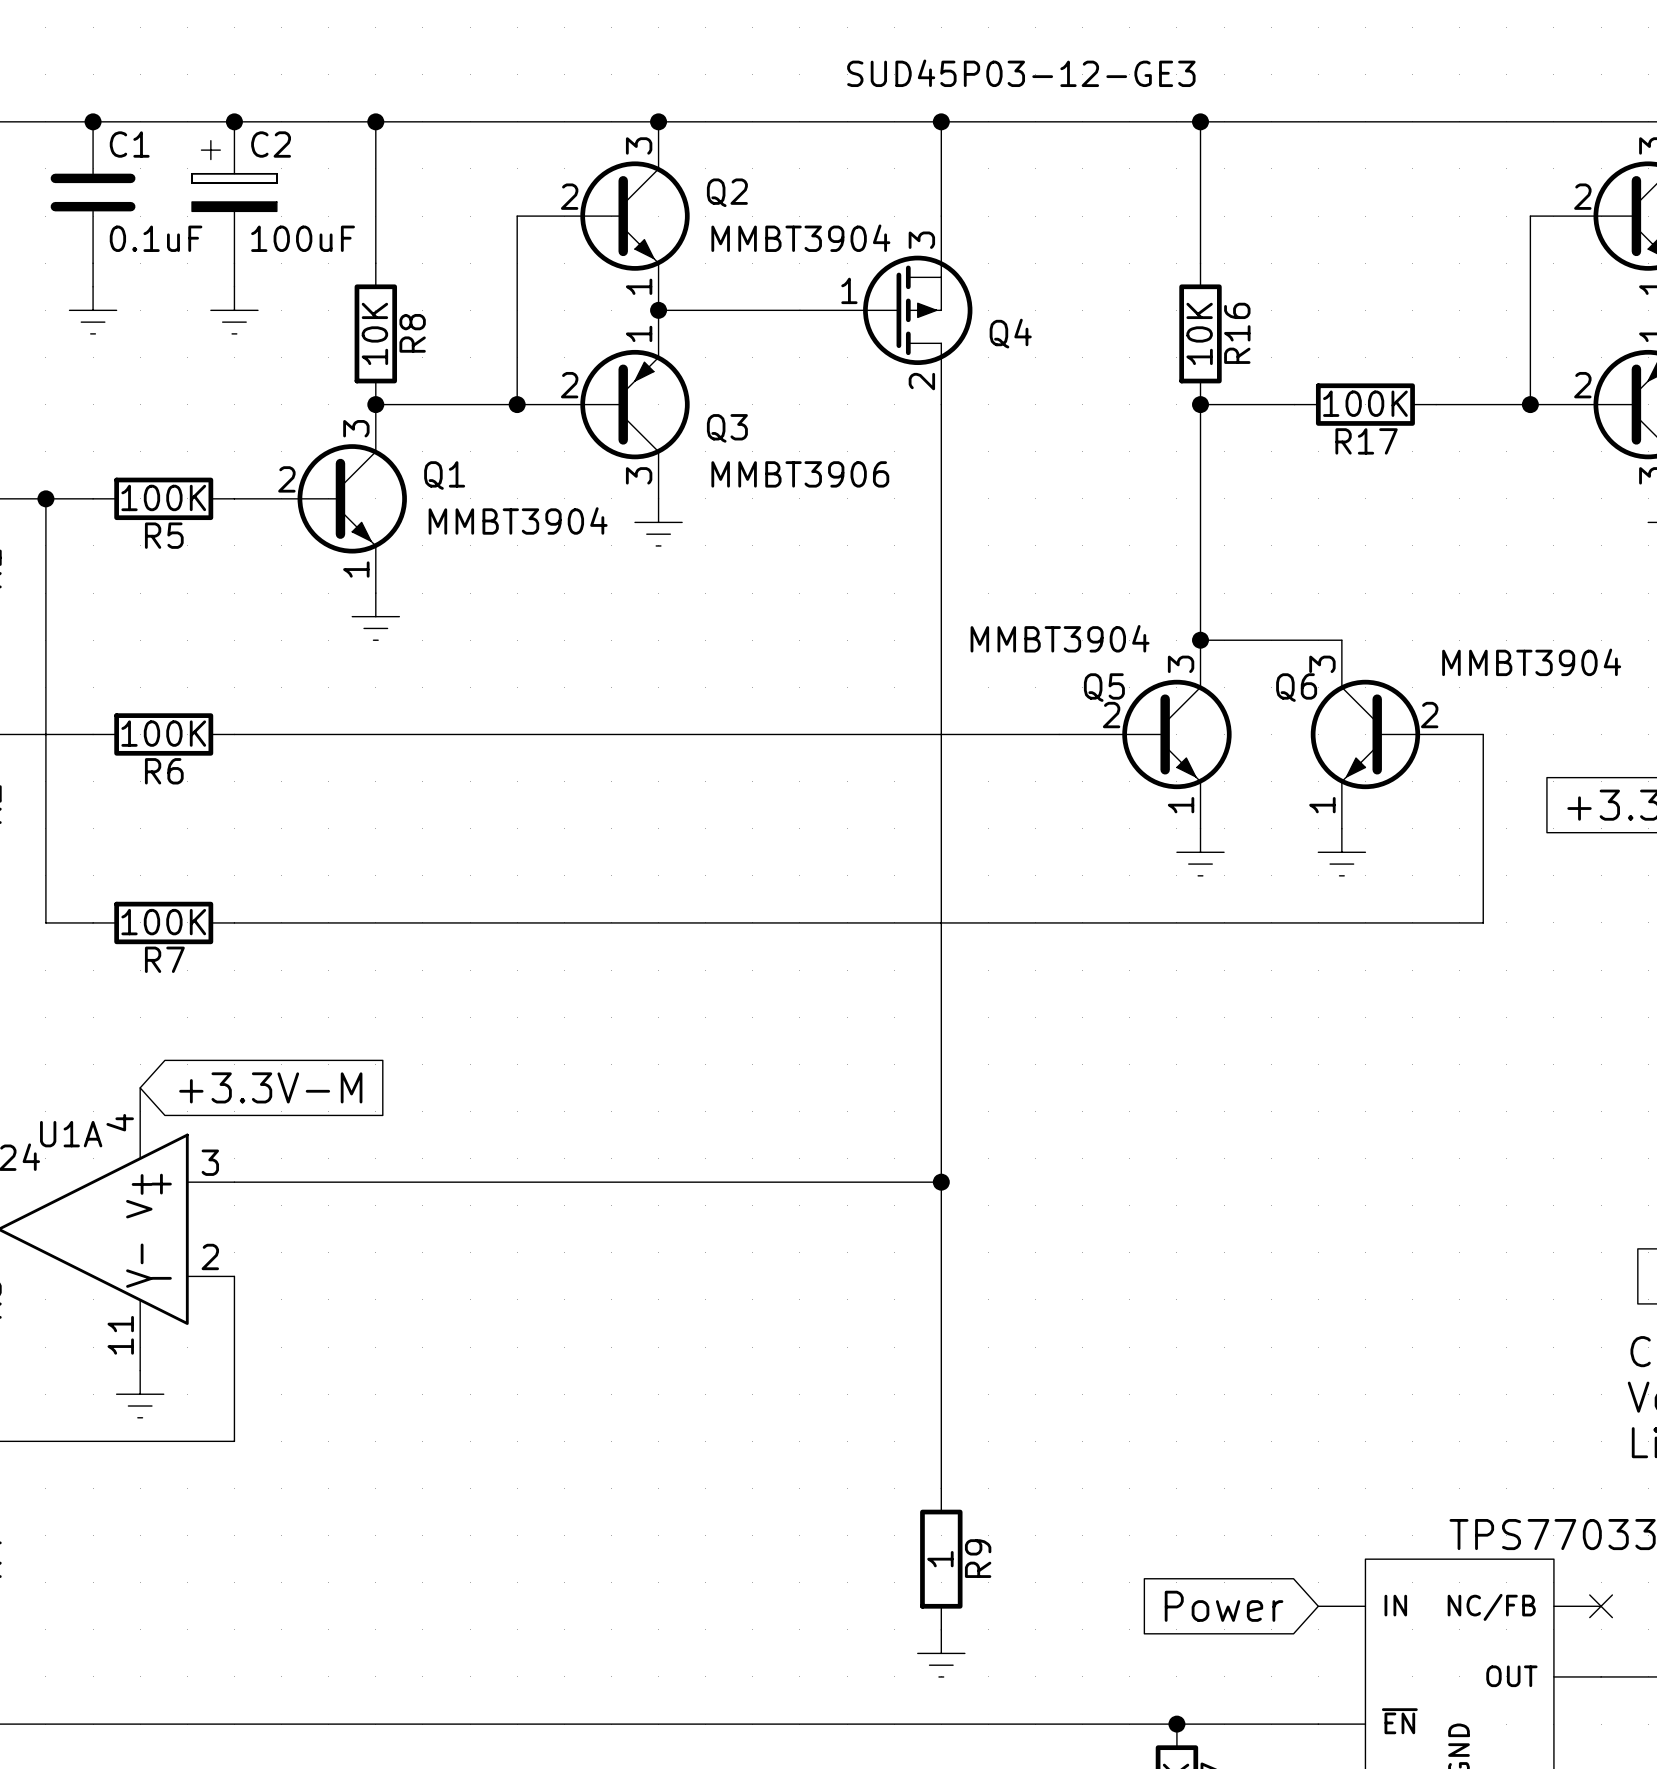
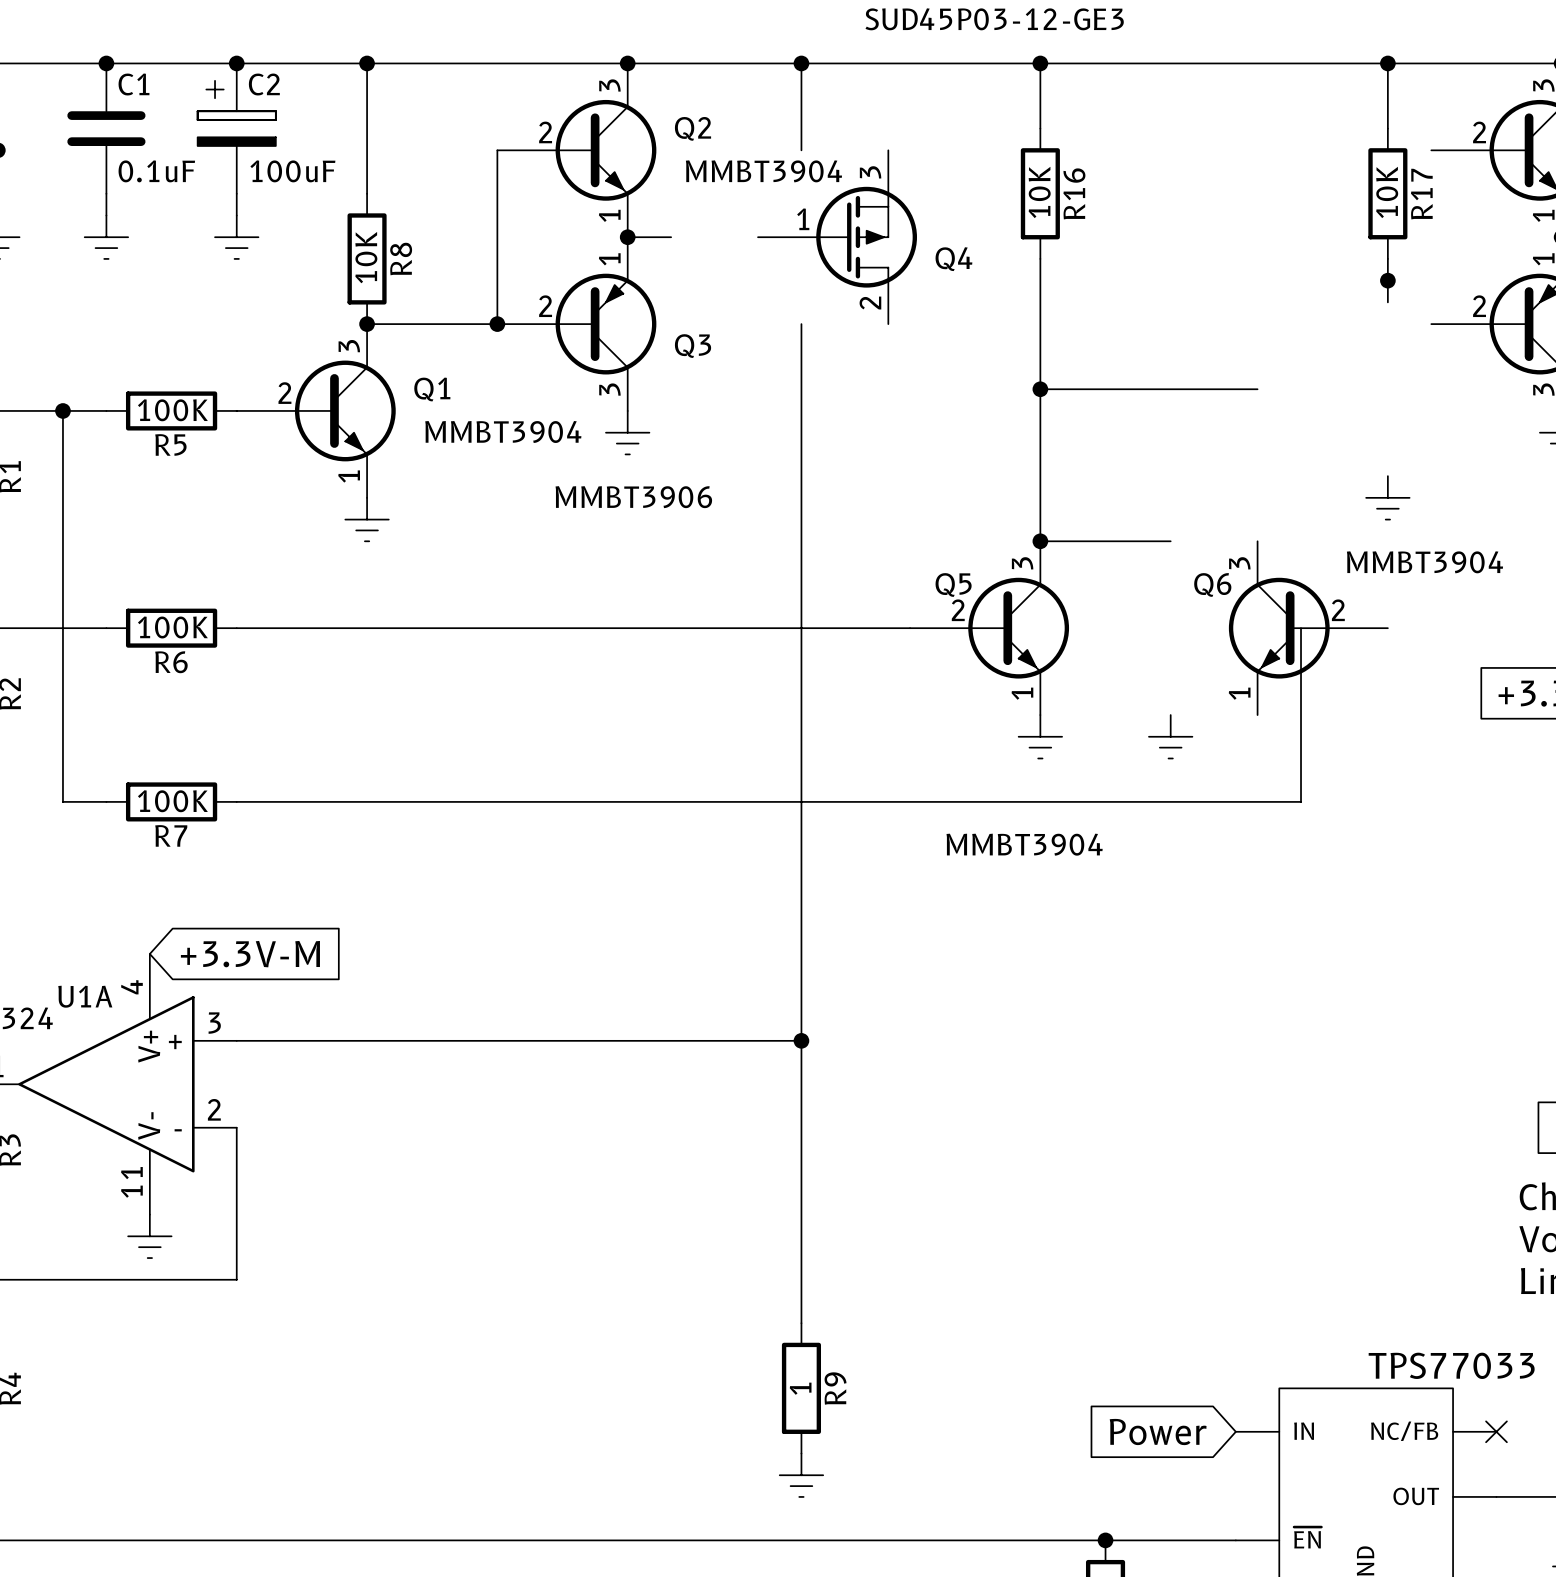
junction: none -> (801, 63)
wire: (941, 121) (941, 216) -> (801, 63) (801, 150)
junction: (941, 121) -> none
wire: none -> (1040, 63) (1040, 128)
junction: none -> (1040, 63)
wire: (1200, 121) (1200, 263) -> none
junction: (1200, 121) -> none
wire: none -> (1387, 63) (1387, 128)
junction: none -> (1387, 63)
wire: (1530, 216) (1530, 404) (1436, 404) -> none
wire: (705, 310) (799, 310) -> none
R16 position: (1200, 333) -> (1040, 193)
wire: none -> (1387, 258) (1387, 302)
R17 value: 100K (1365, 403) -> 10K (1387, 192)
wire: (941, 404) (941, 1488) -> (801, 324) (801, 1323)
junction: (1200, 404) -> none
wire: (1294, 404) (1200, 404) (1200, 640) -> (1040, 258) (1040, 541) (1127, 541)
R17 rotation: 0° (1365, 404) -> 90° clockwise (1387, 193)
R17 position: (1365, 404) -> (1387, 193)
junction position: (1530, 404) -> (1387, 280)
R17 name position: R17 (1366, 441) -> R17 (1421, 194)
Q3 value position: MMBT3906 (800, 474) -> MMBT3906 (633, 497)
wire: none -> (1040, 389) (1257, 389)
junction: none -> (1040, 389)
power symbol: none -> (1387, 497)
Q5 value position: MMBT3904 (1060, 638) -> MMBT3904 (1024, 844)
junction position: (1200, 640) -> (1040, 541)
wire: (1247, 640) (1341, 640) -> none
Q5 position: (1145, 734) -> (989, 628)
wire: (1483, 734) (1483, 922) (1389, 922) -> (1301, 628) (1301, 801)
power symbol: none -> (1040, 736)
power symbol: (1200, 852) -> none
power symbol: none -> (1170, 736)
power symbol: (1341, 852) -> none
wire: (847, 1182) (941, 1182) -> none
junction position: (941, 1182) -> (801, 1040)
R9 position: (941, 1559) -> (801, 1388)
power symbol position: (941, 1653) -> (801, 1475)

